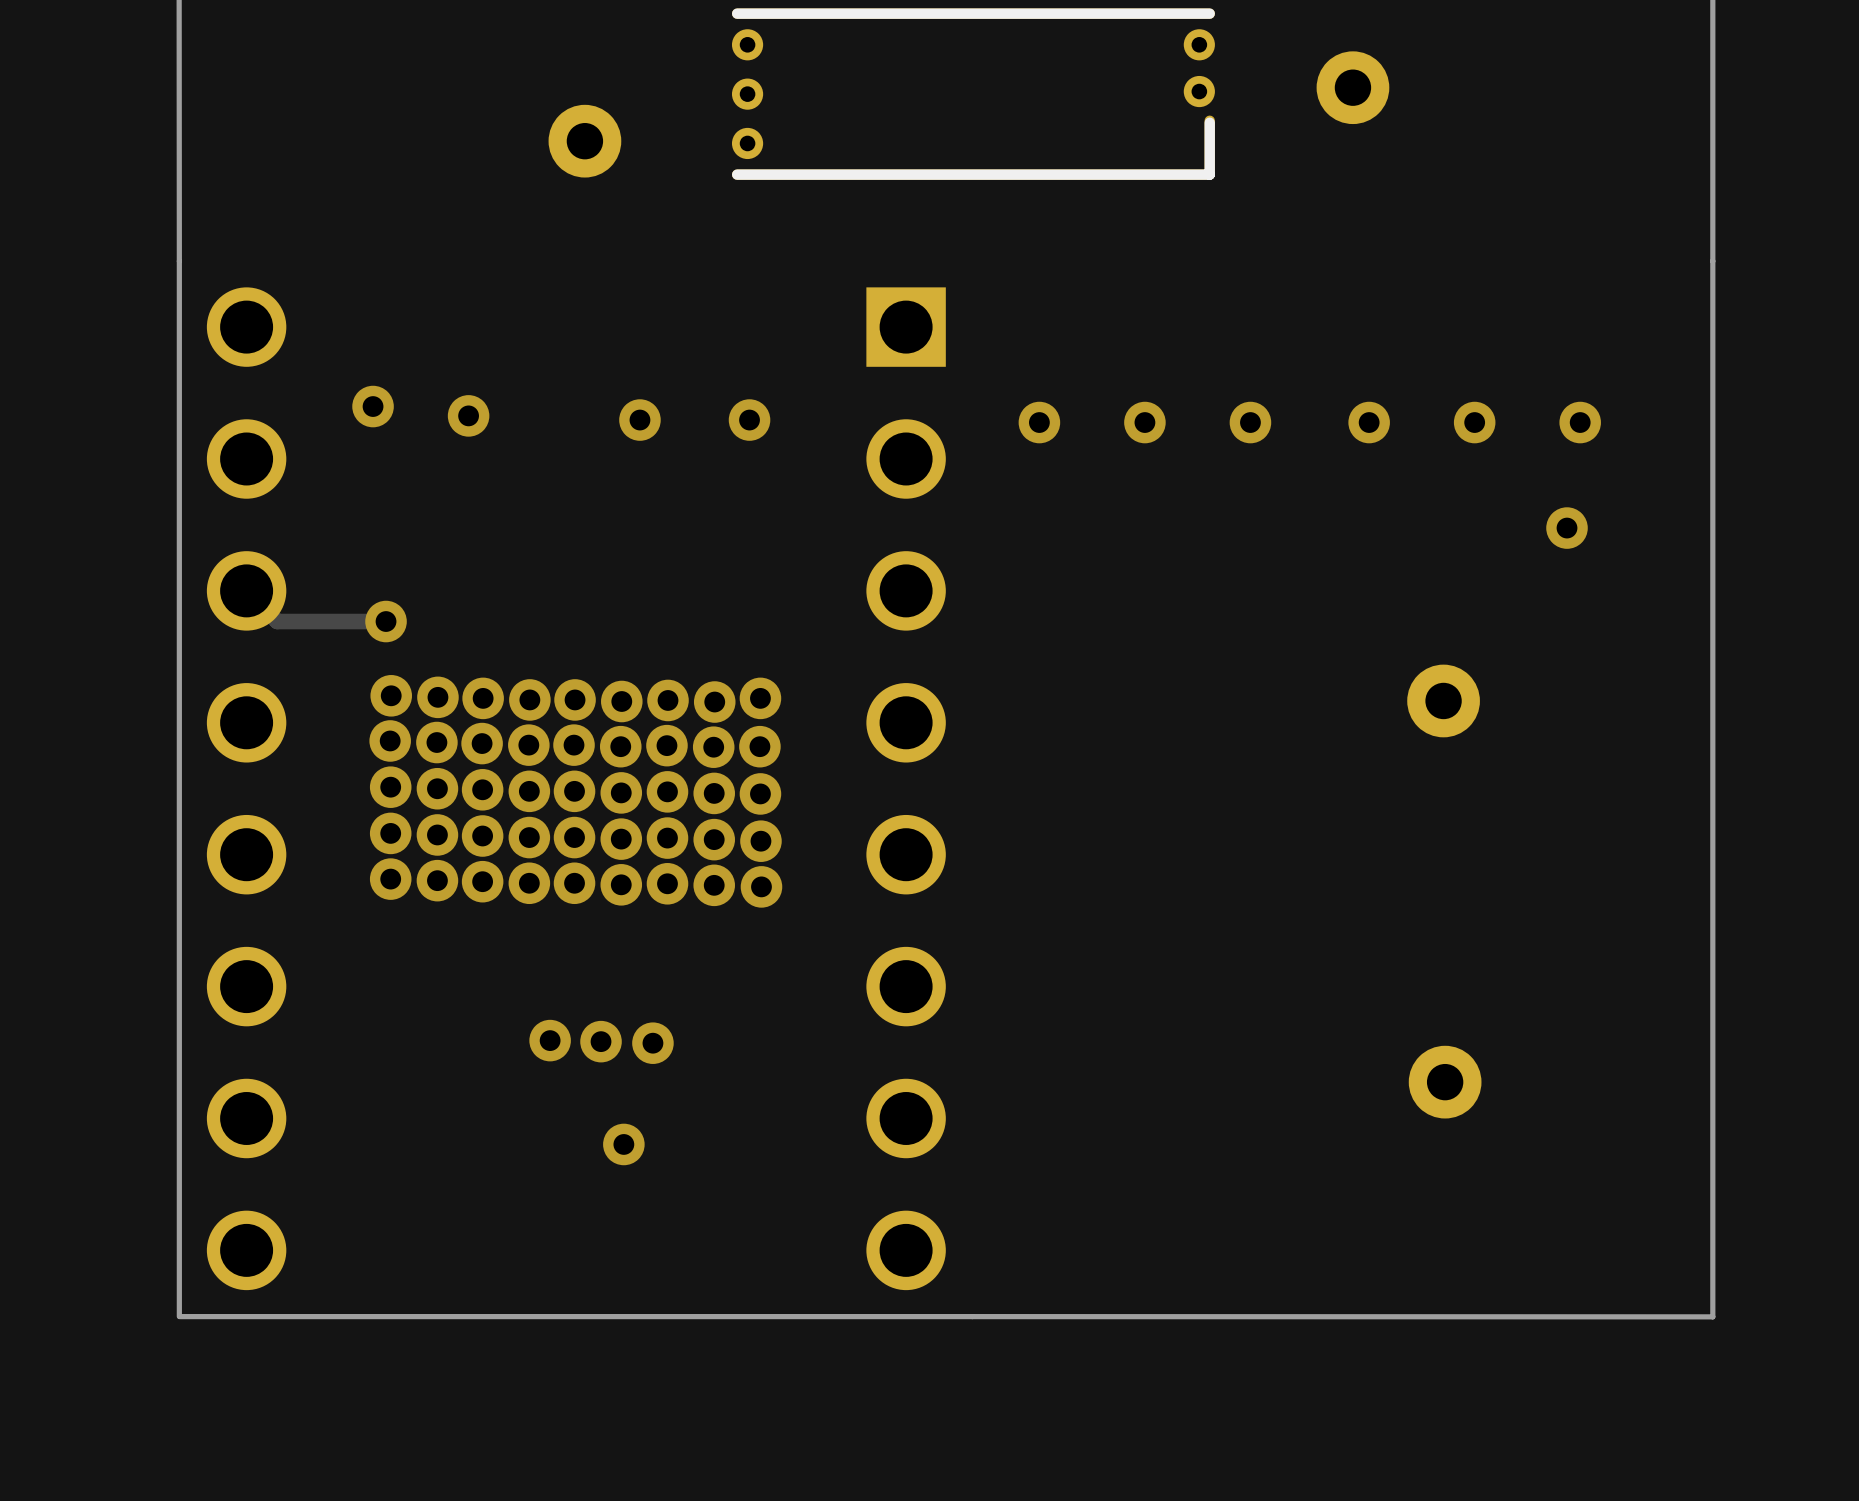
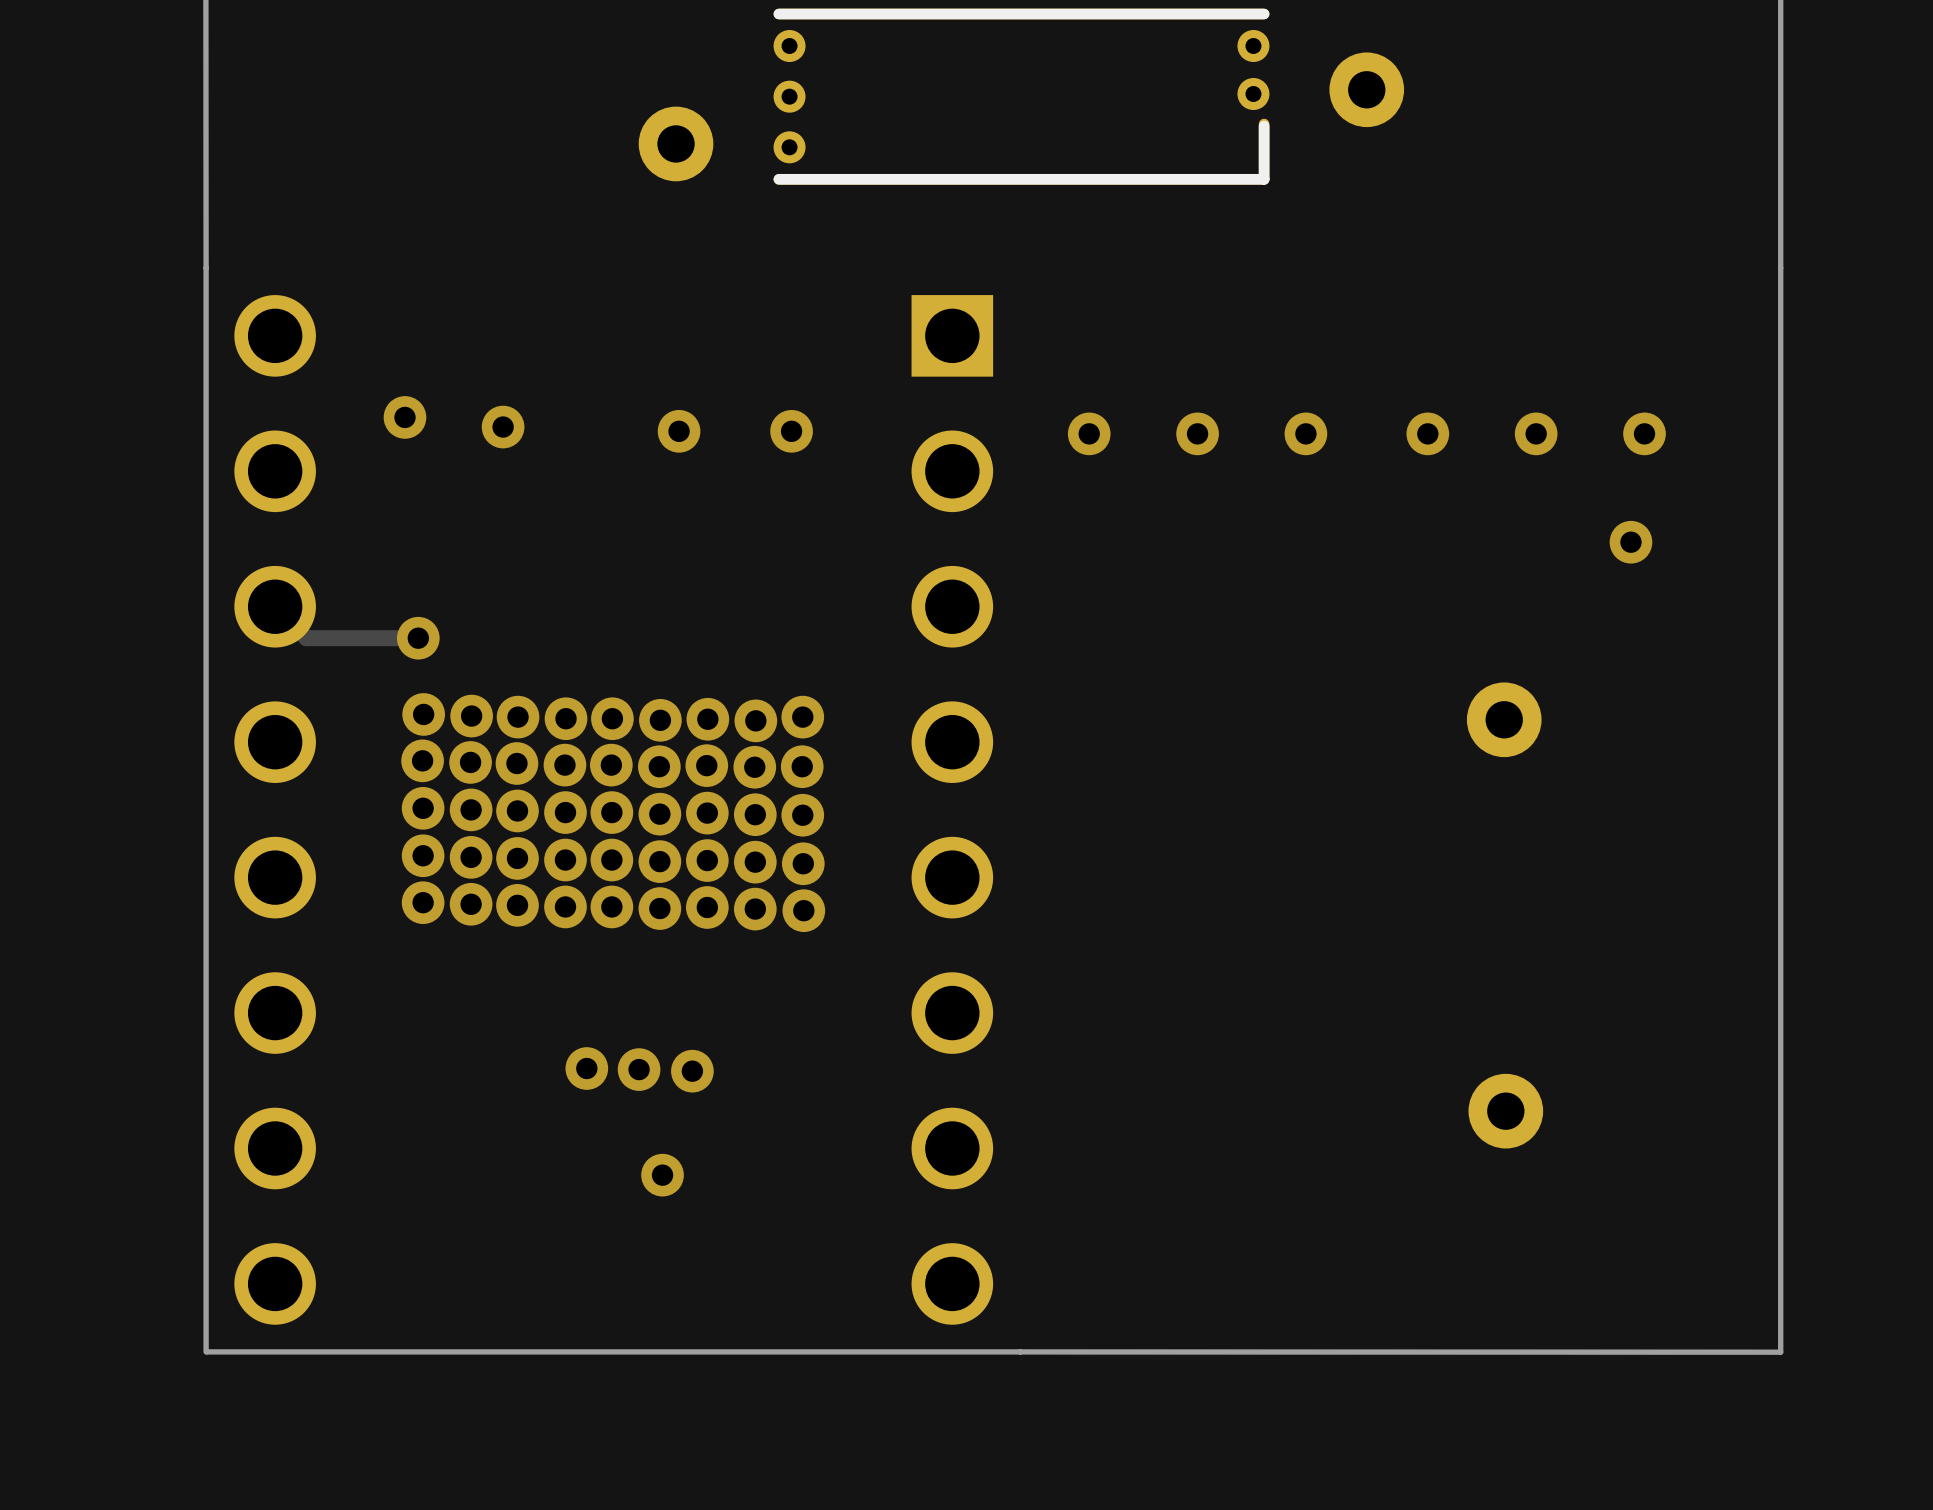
part position: (1352, 87) -> (1366, 89)
part position: (584, 141) -> (676, 143)

